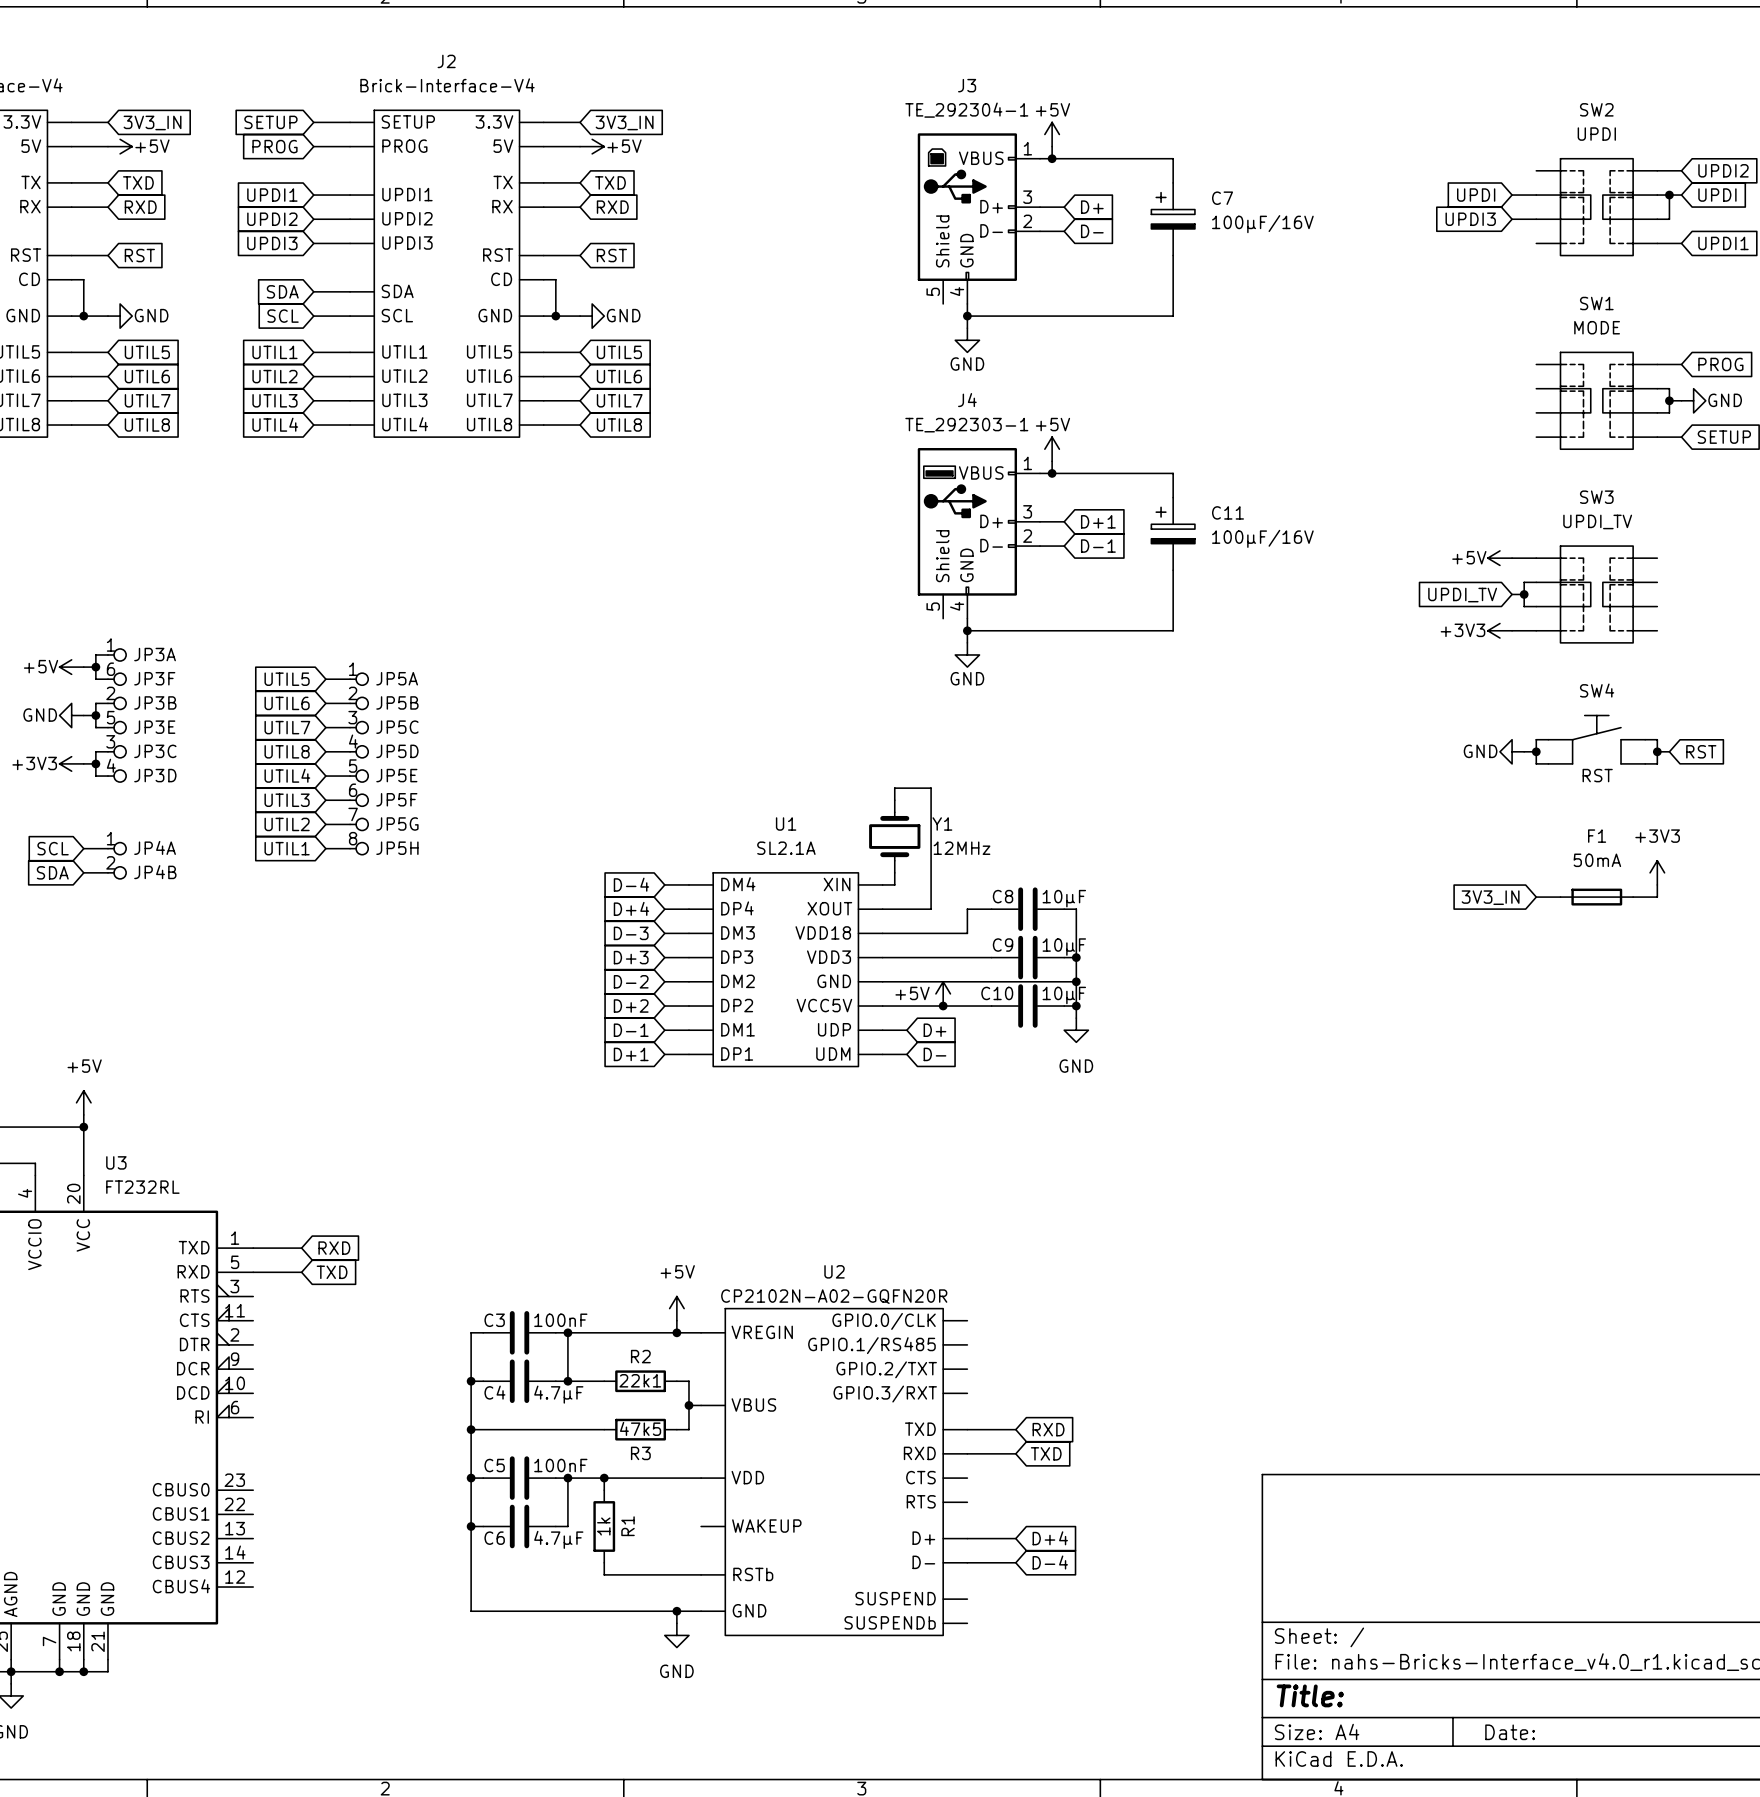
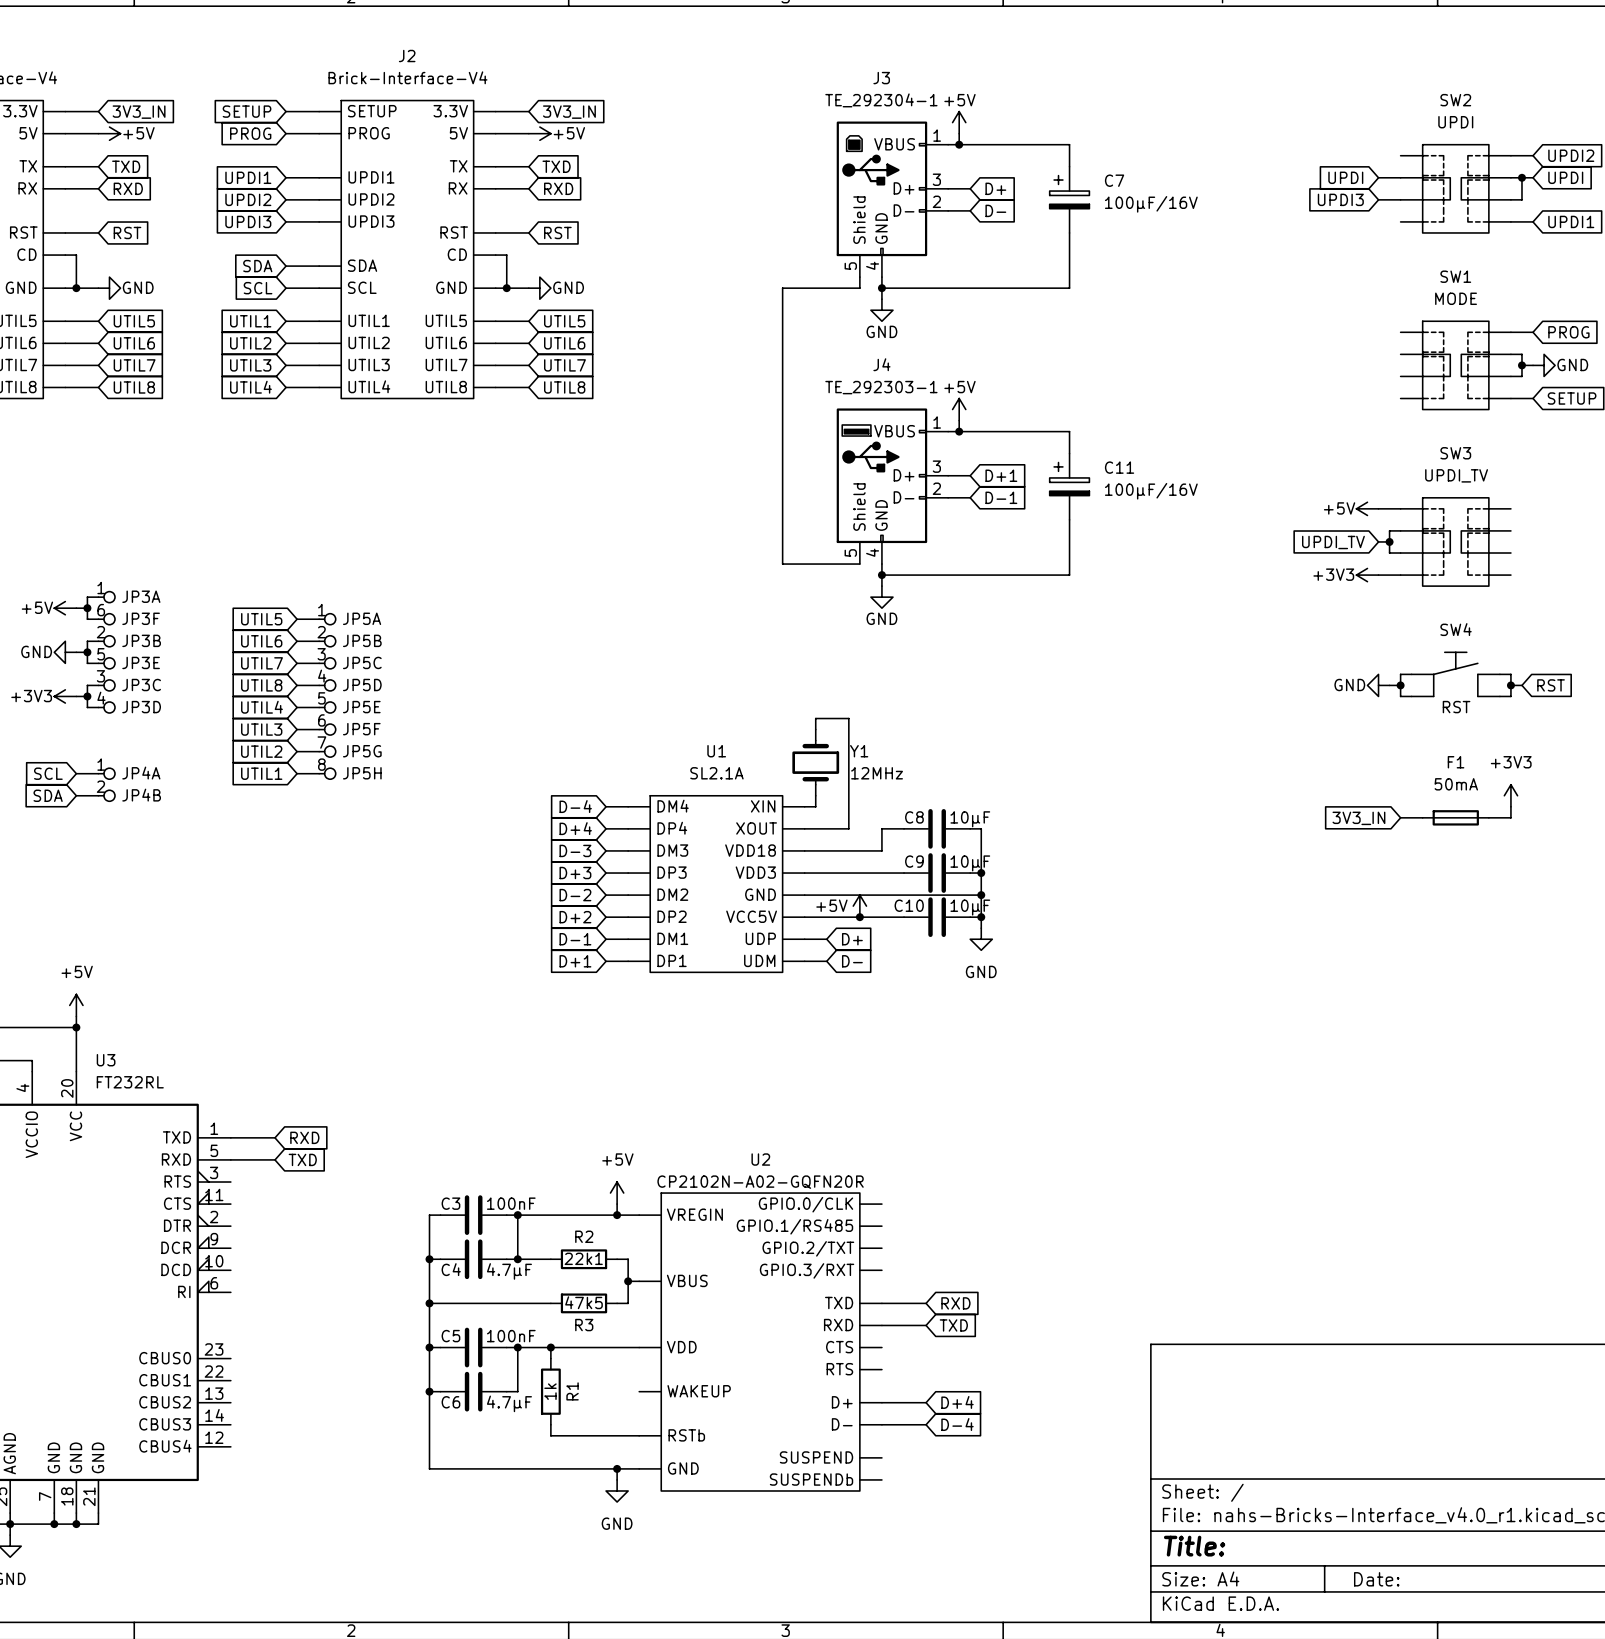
wire: none -> (859, 277) (859, 288) (782, 288) (782, 564) (859, 564)

